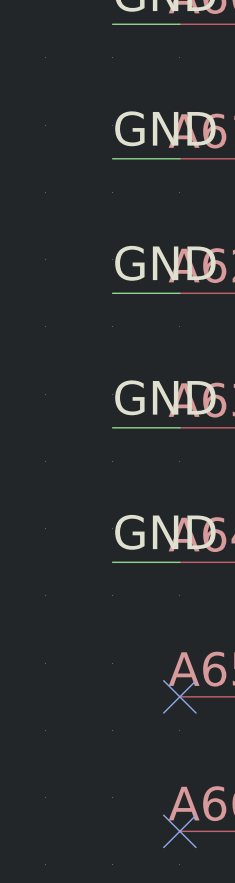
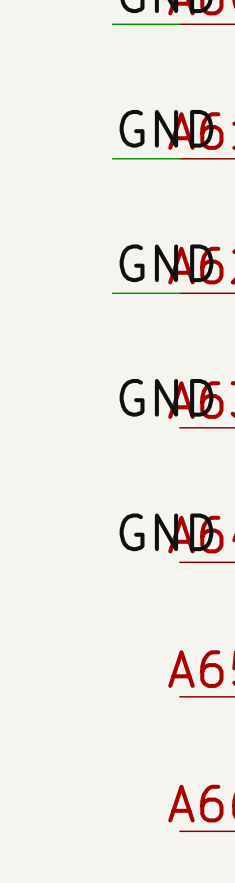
wire: (112, 427) (179, 427) -> none
wire: (112, 562) (179, 562) -> none
no-connect mark: (179, 696) -> none
no-connect mark: (179, 831) -> none

